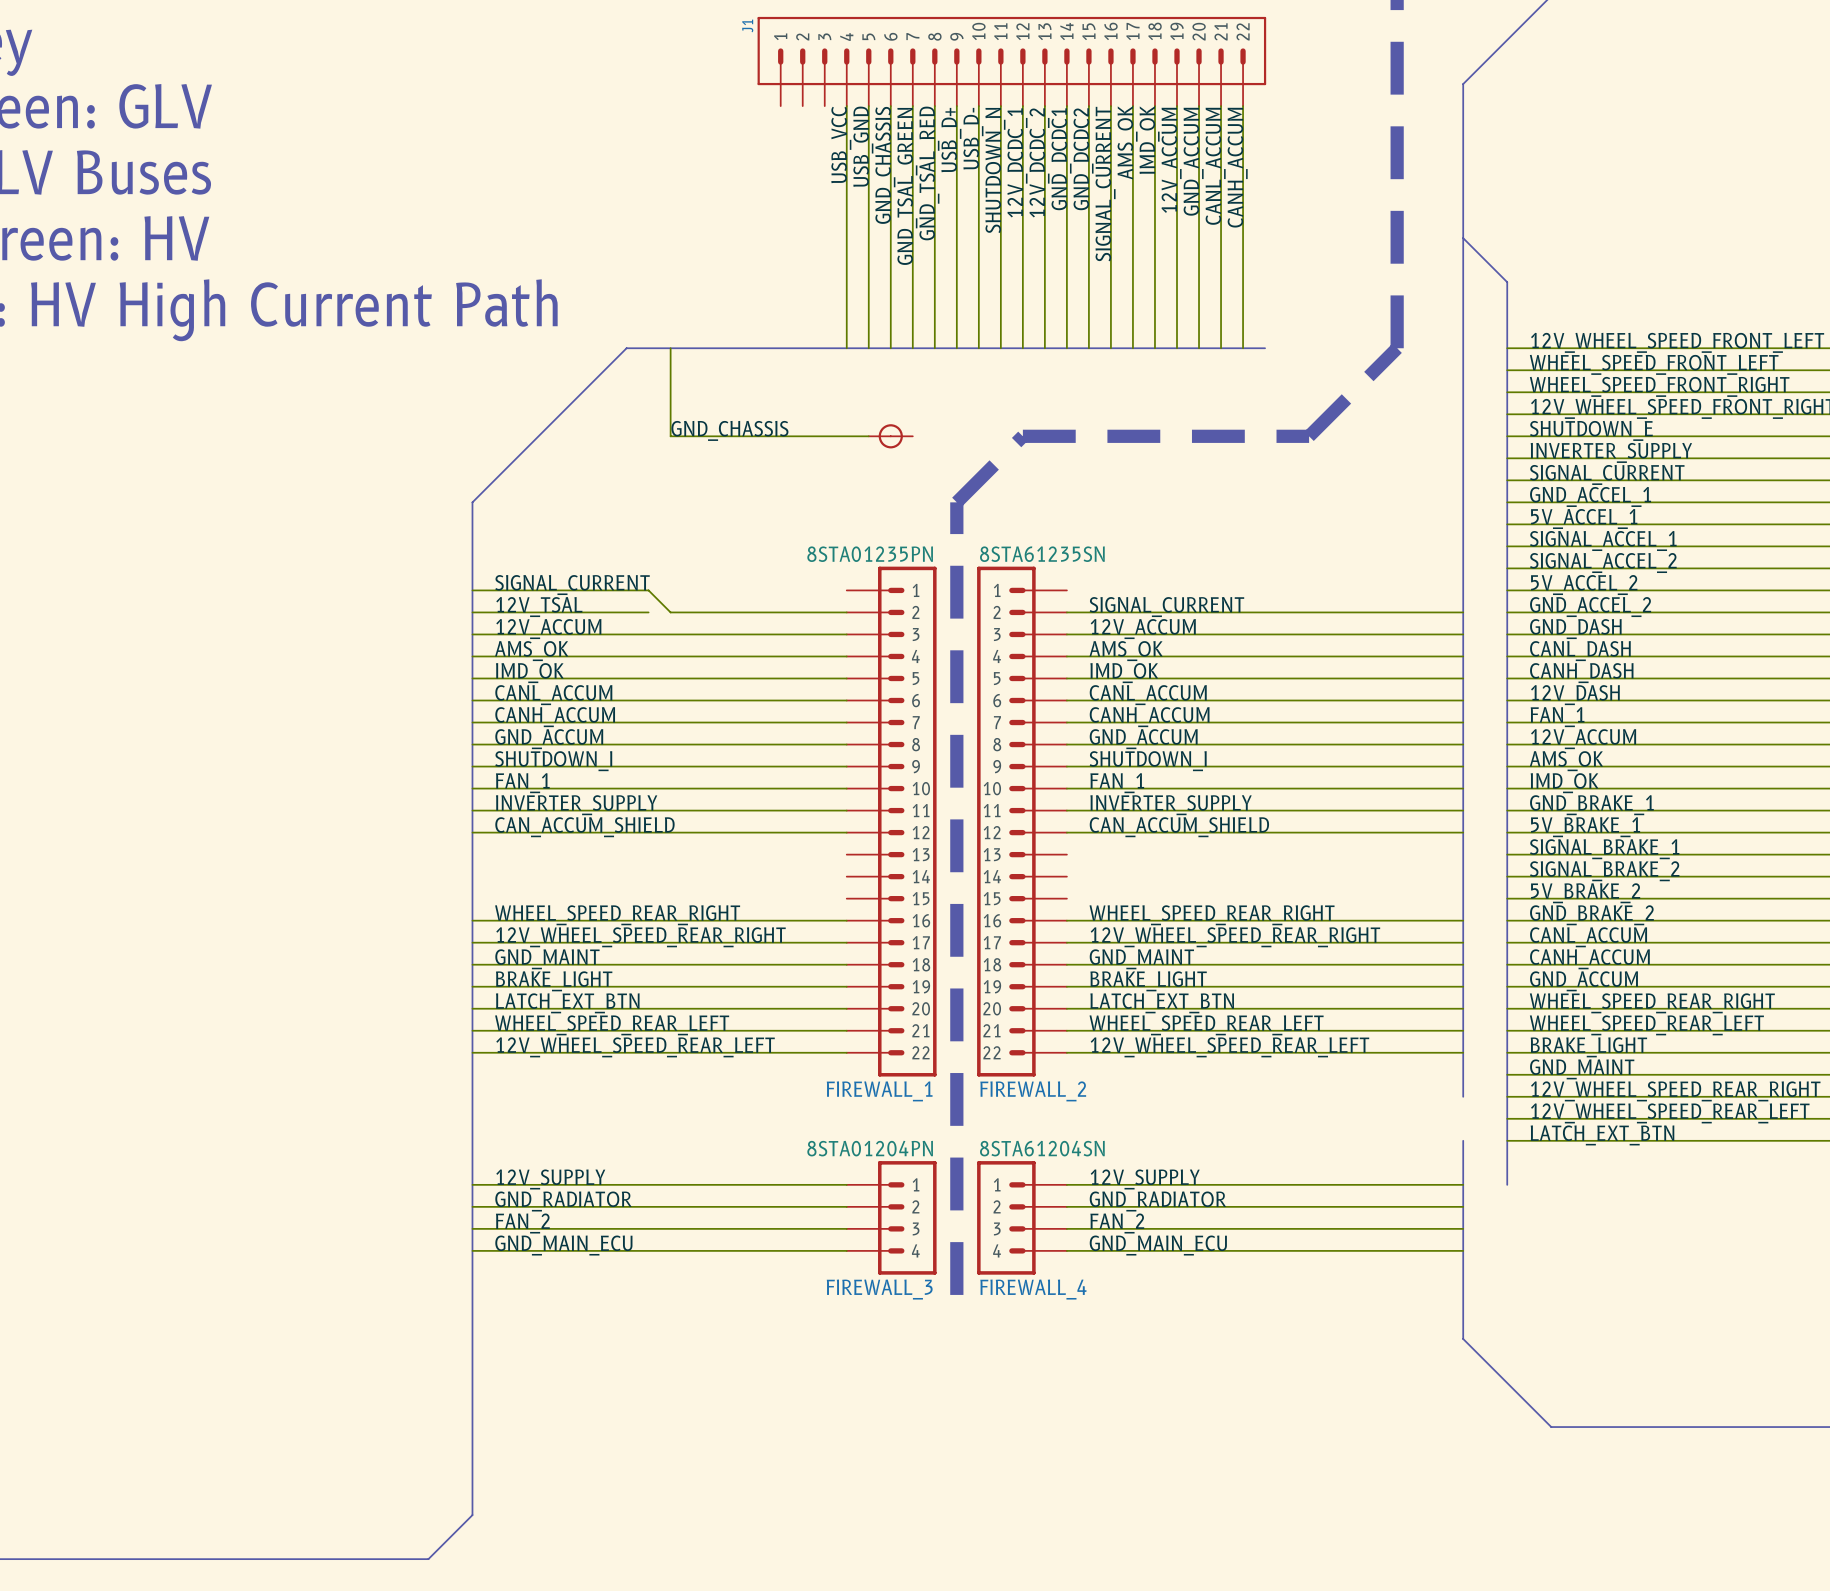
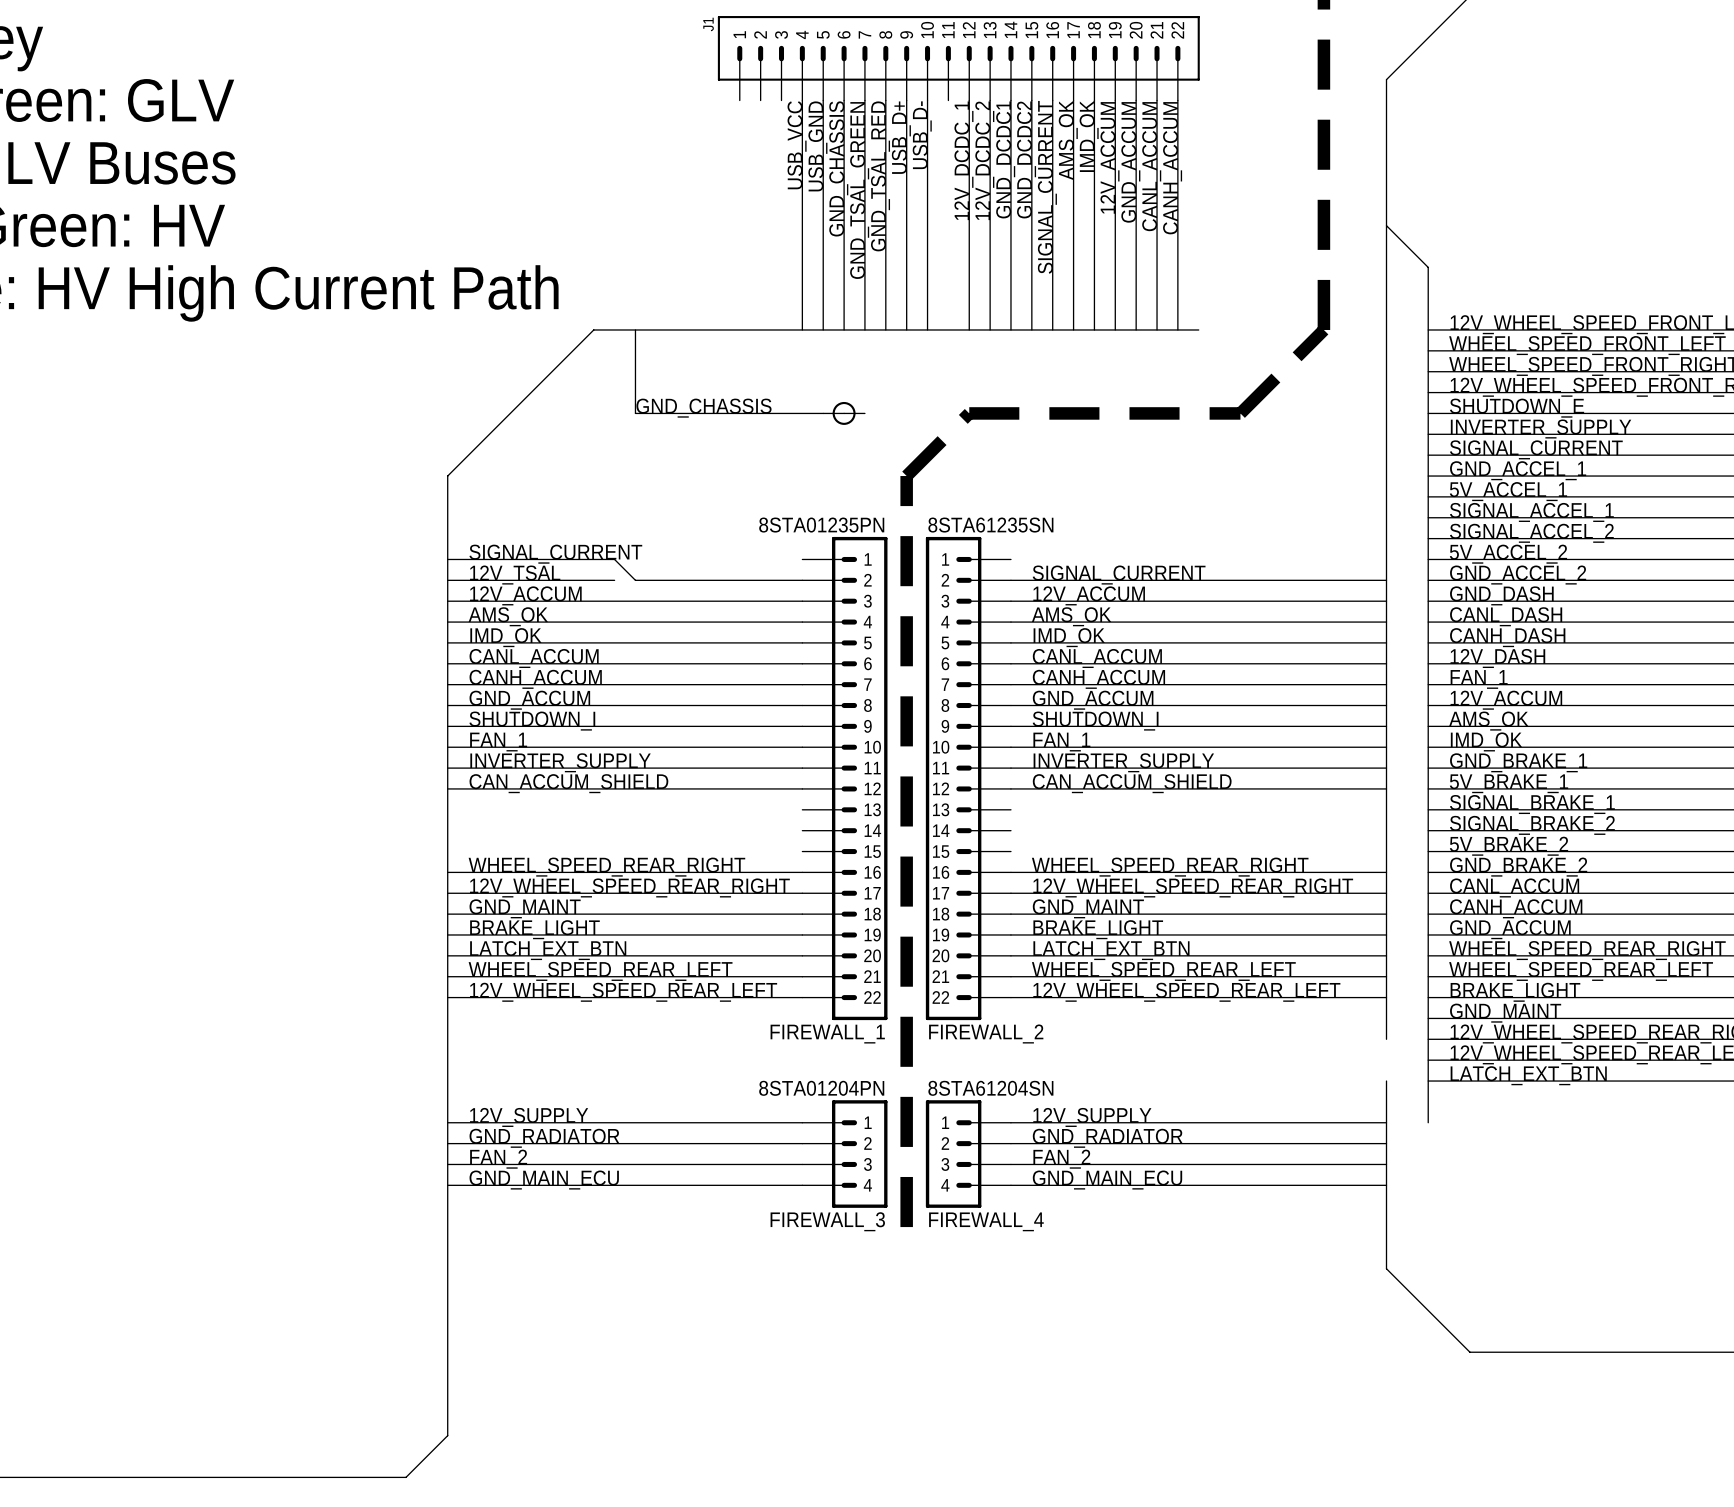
wire: (1000, 106) (1000, 348) -> none
label: SHUTDOWN_N (995, 170) -> none

